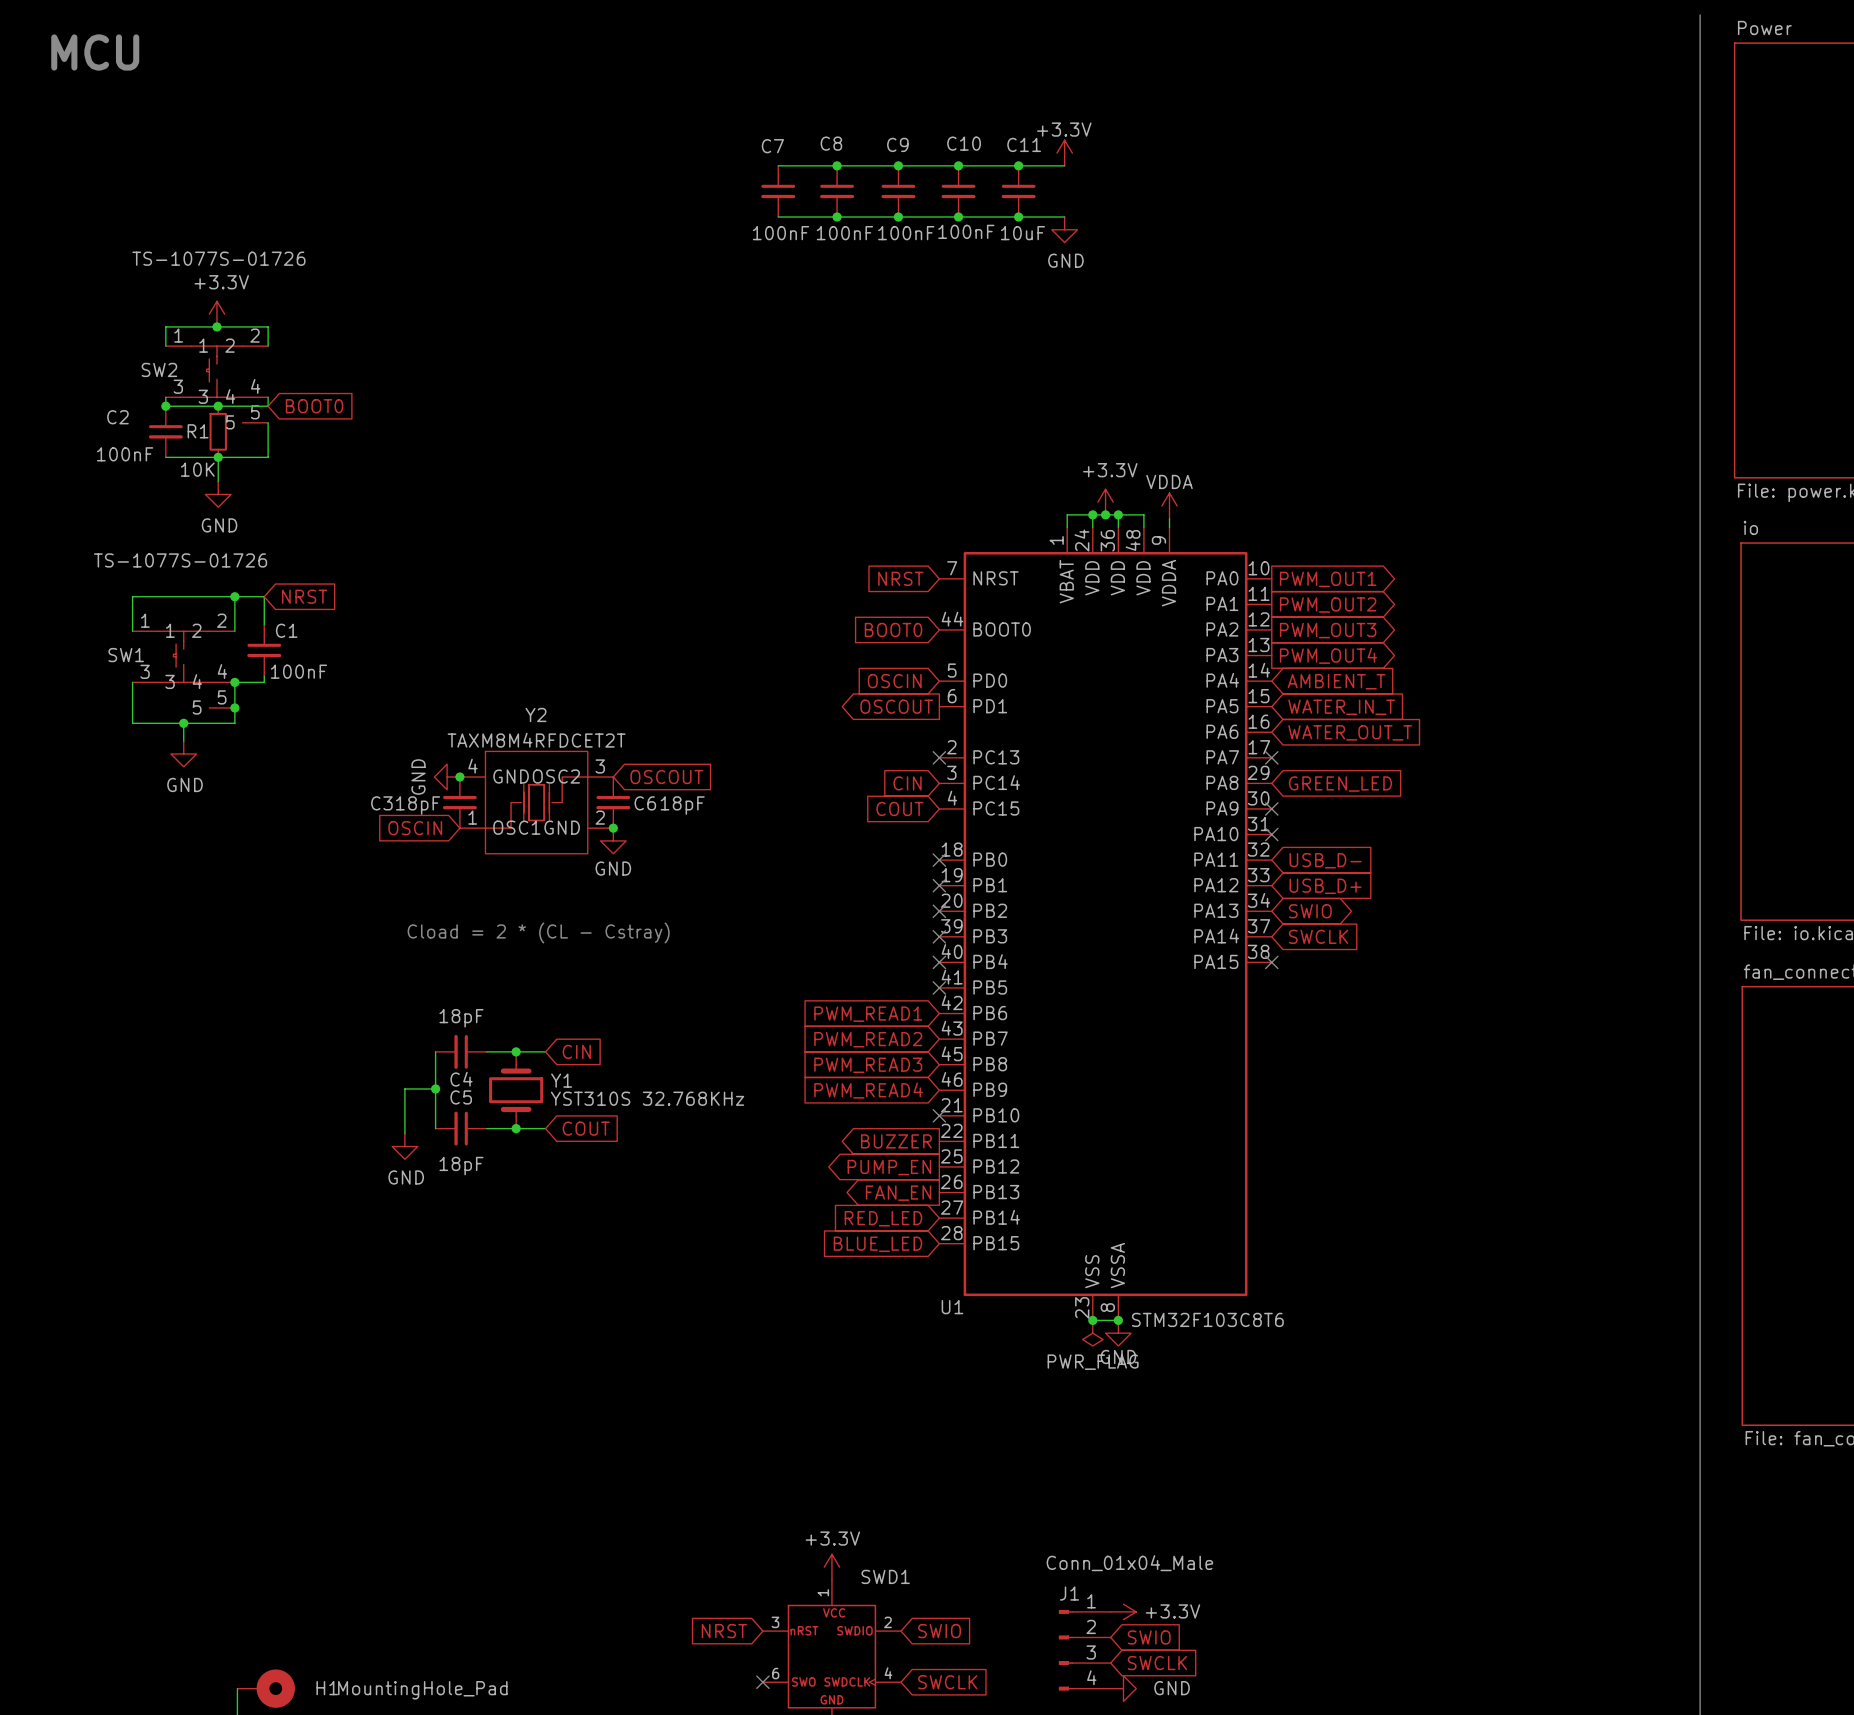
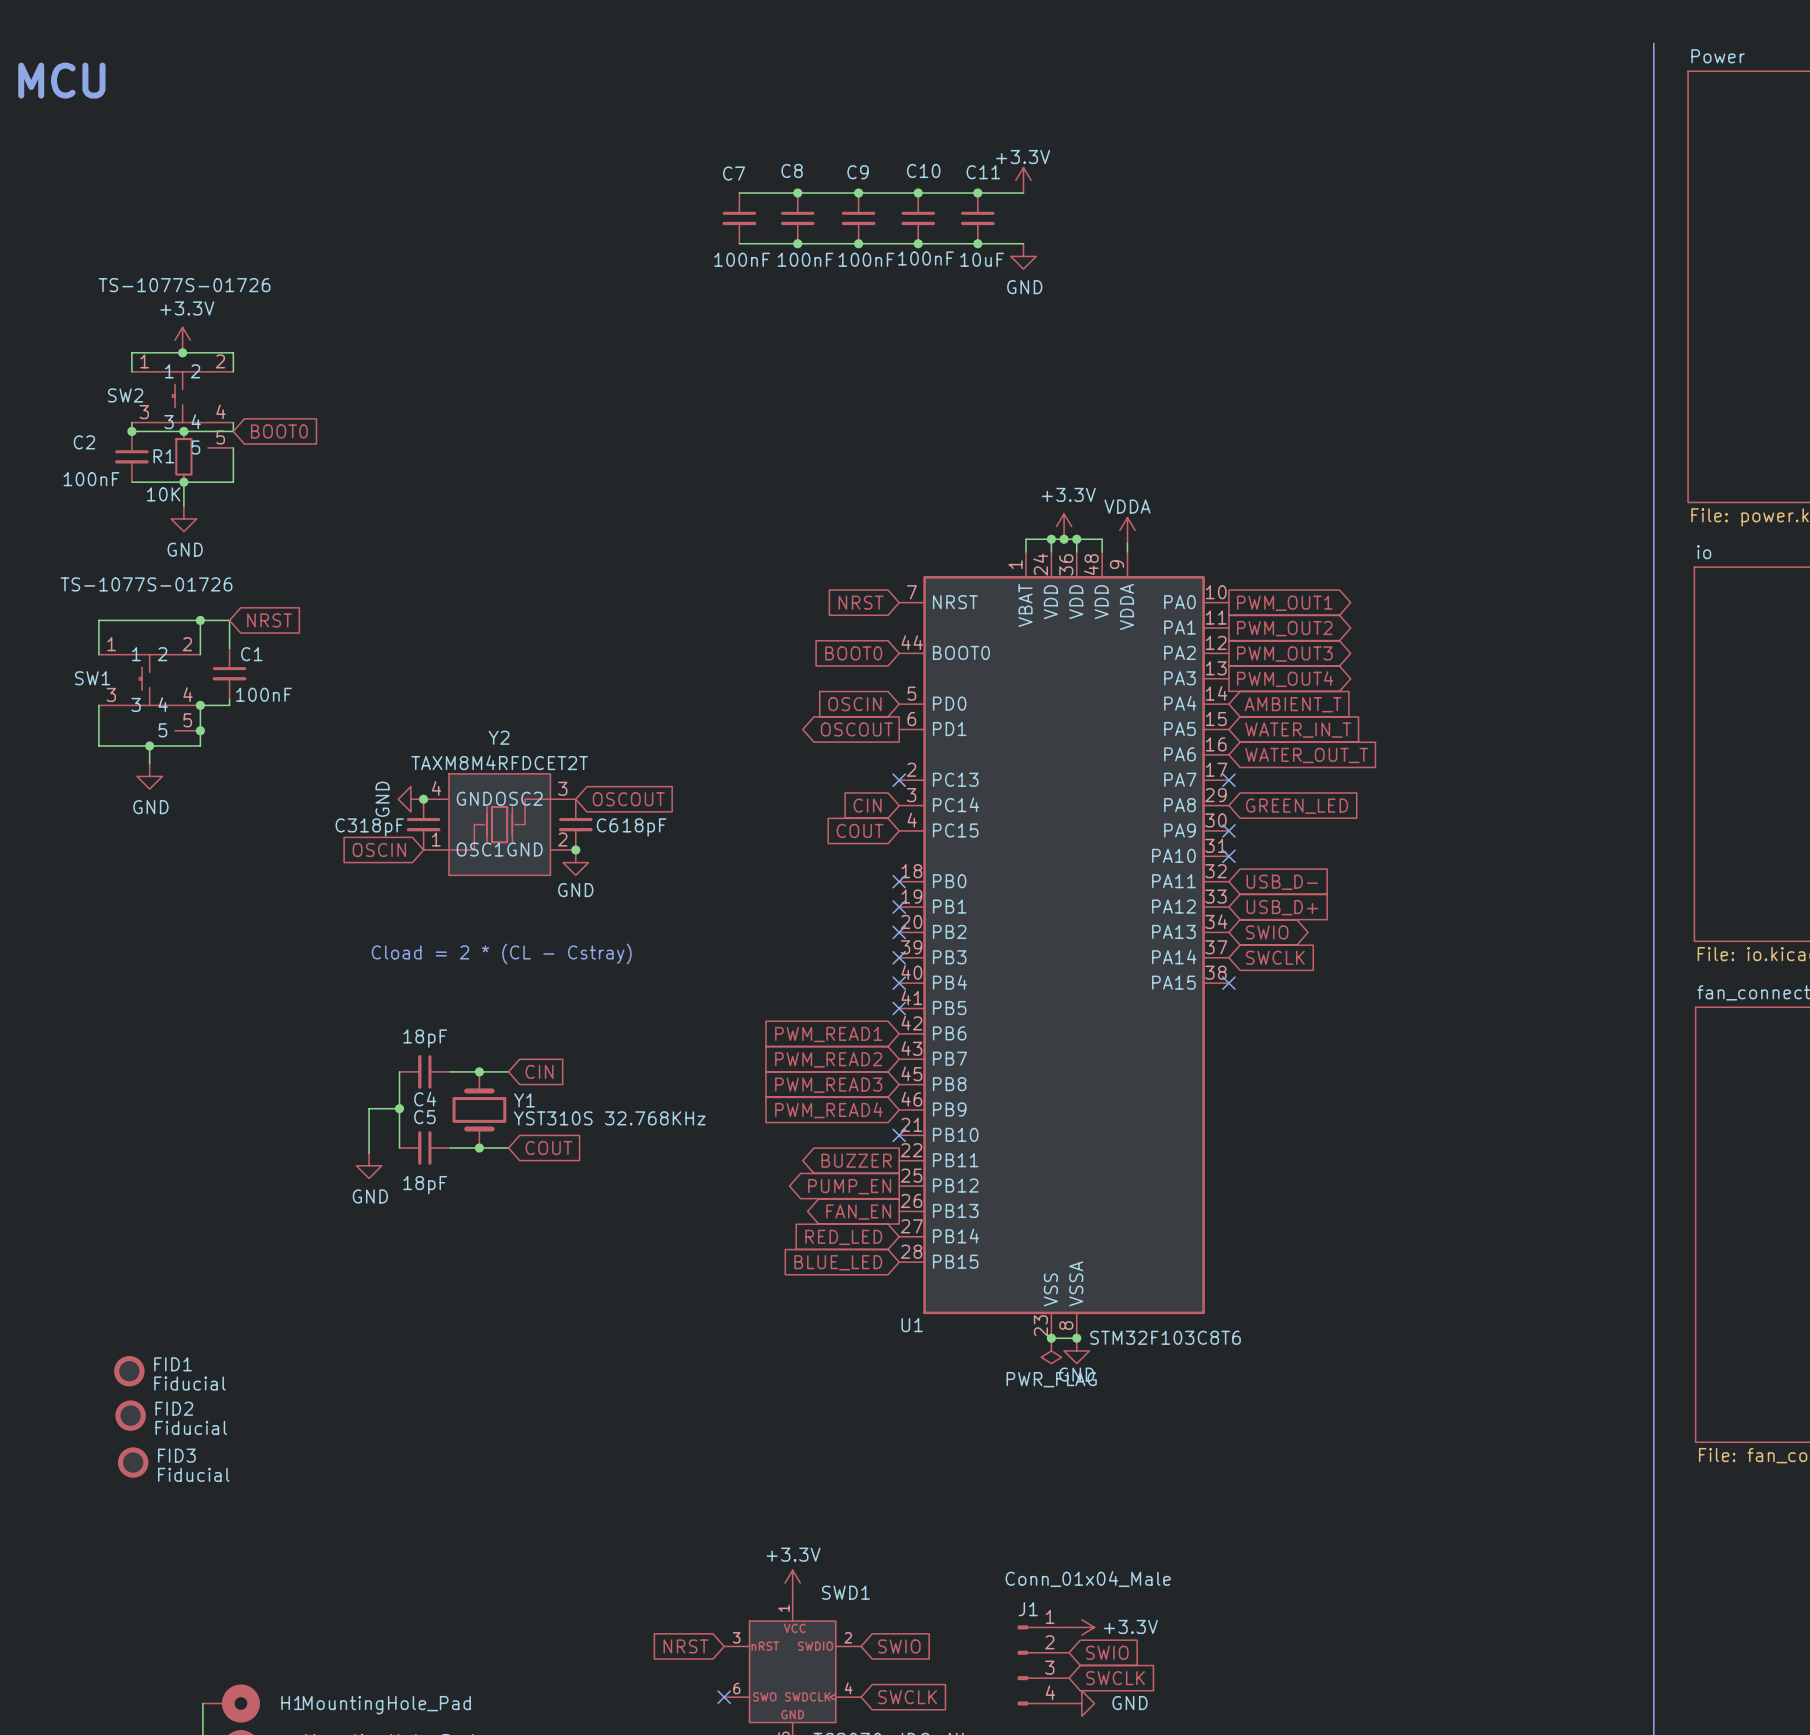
FID1: none -> Fiducial (129, 1371)
FID2: none -> Fiducial (130, 1415)
FID3: none -> Fiducial (133, 1462)

